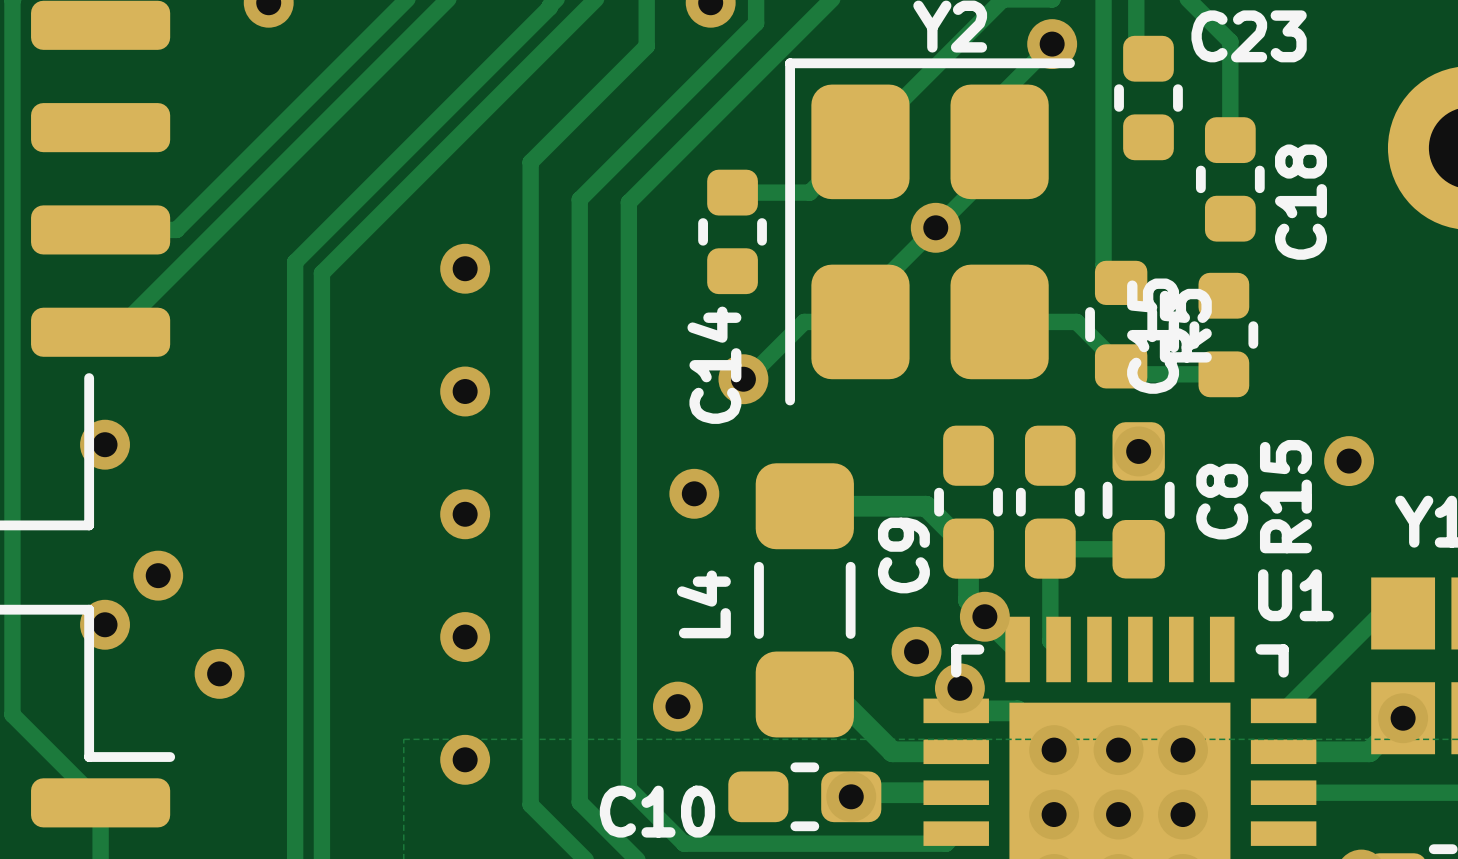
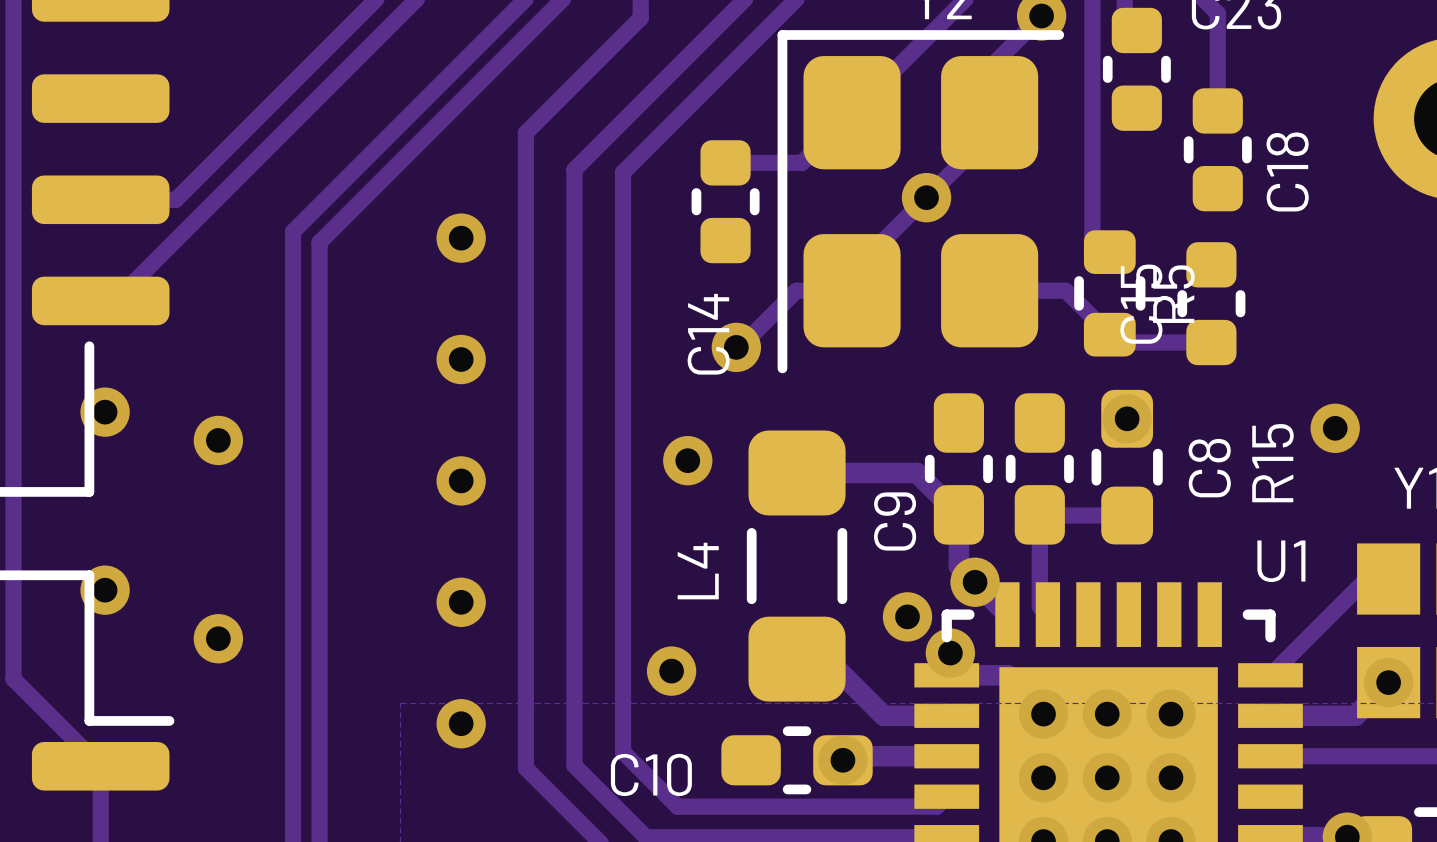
via position: (158, 575) -> (218, 440)

